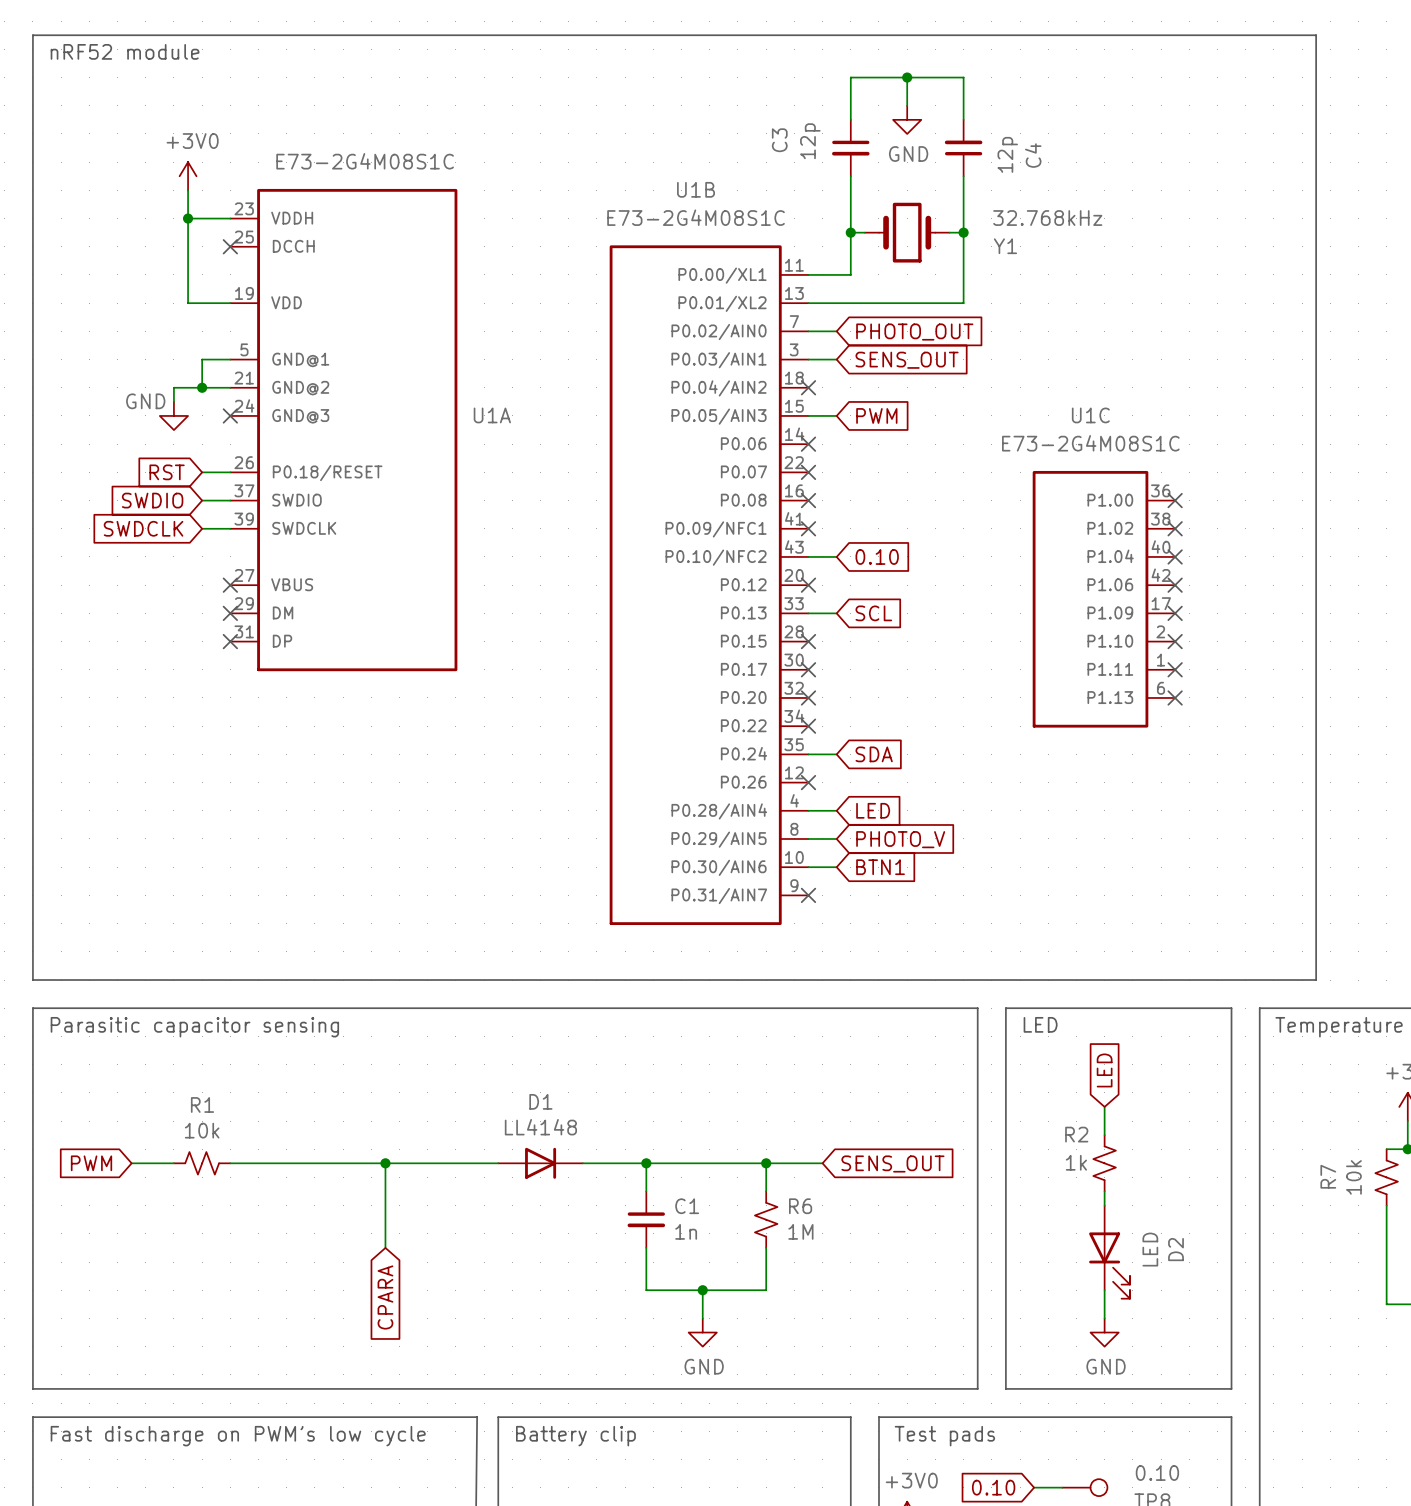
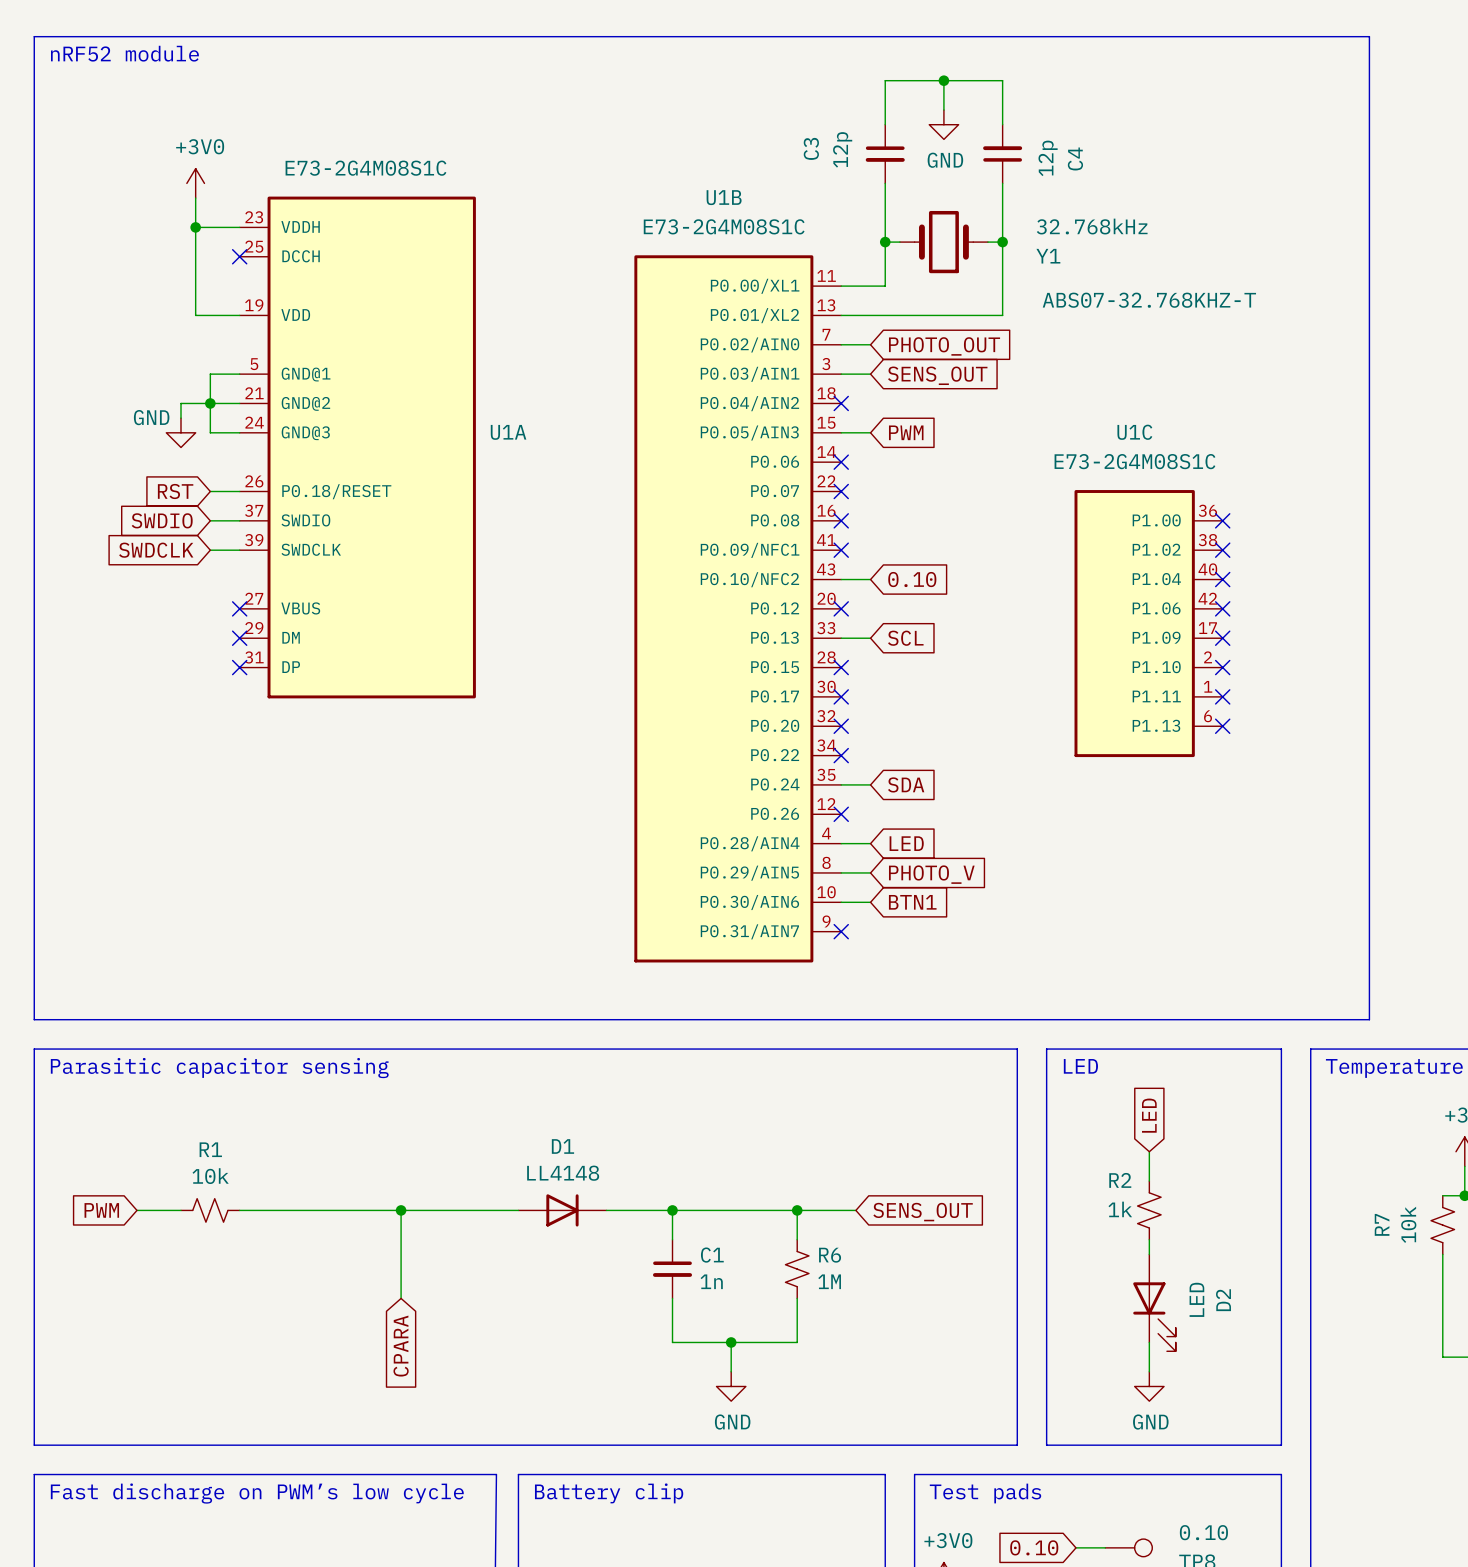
Y1 text: none -> ABS07-32.768KHZ-T (1149, 300)
wire: none -> (210, 403) (210, 432) (239, 432)
no-connect mark: (230, 415) -> none

